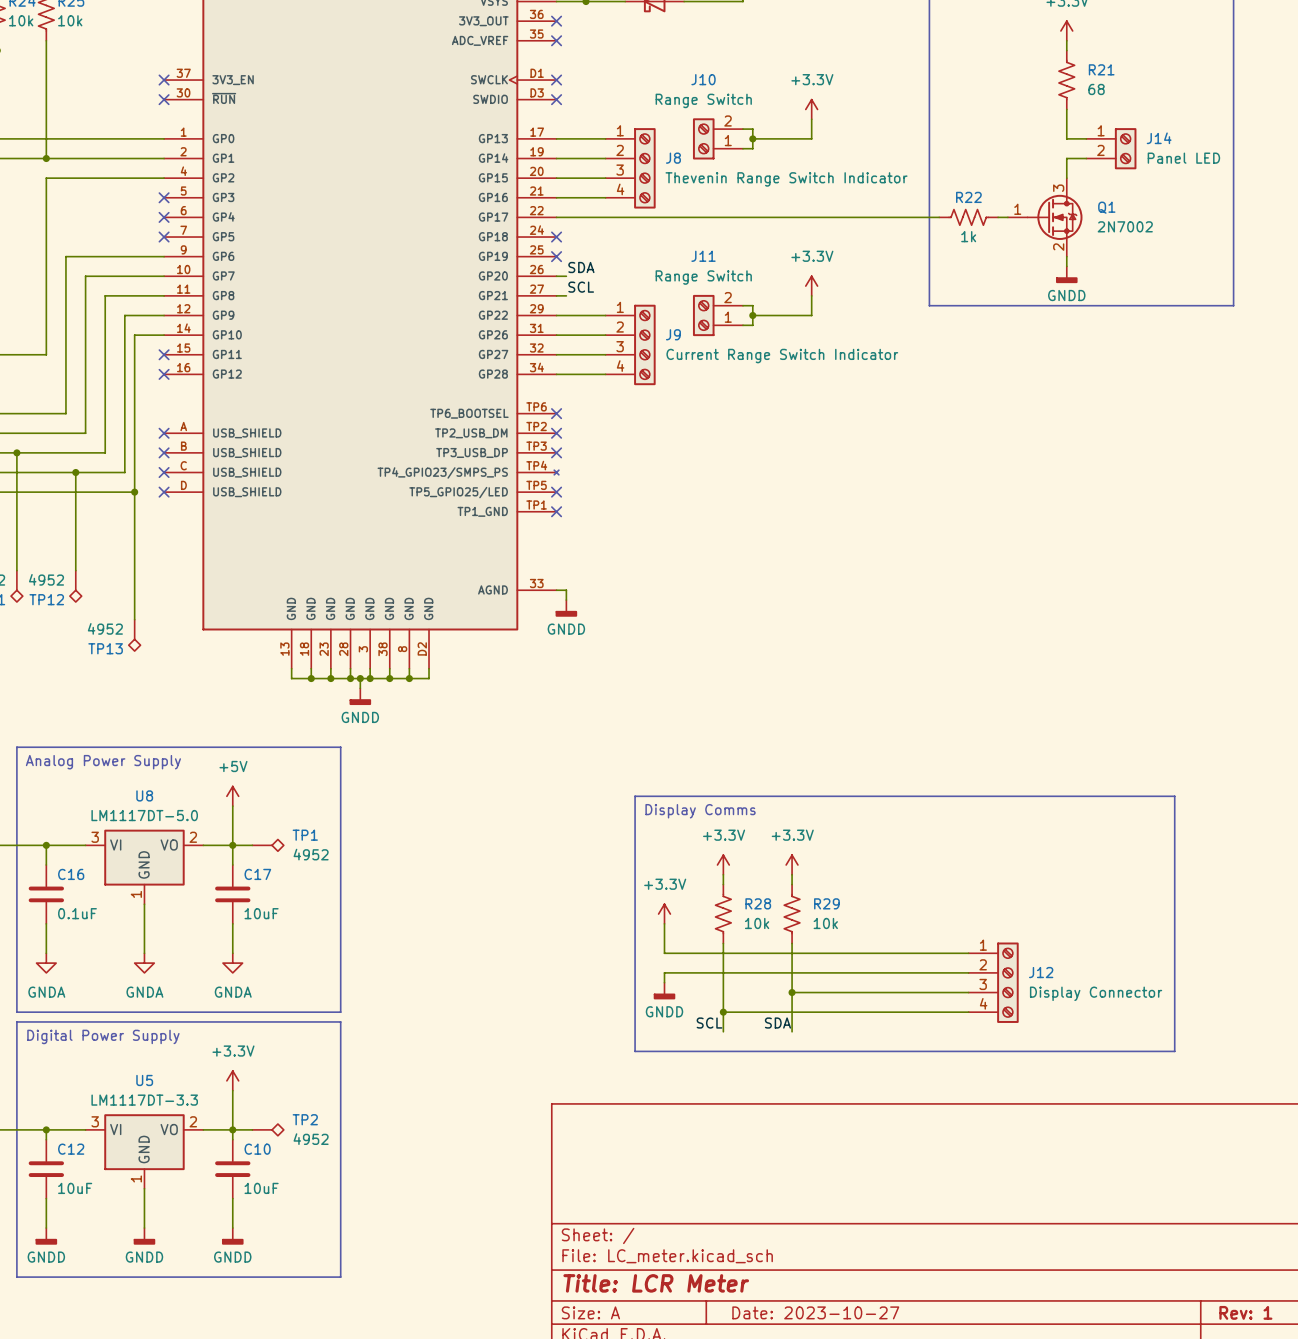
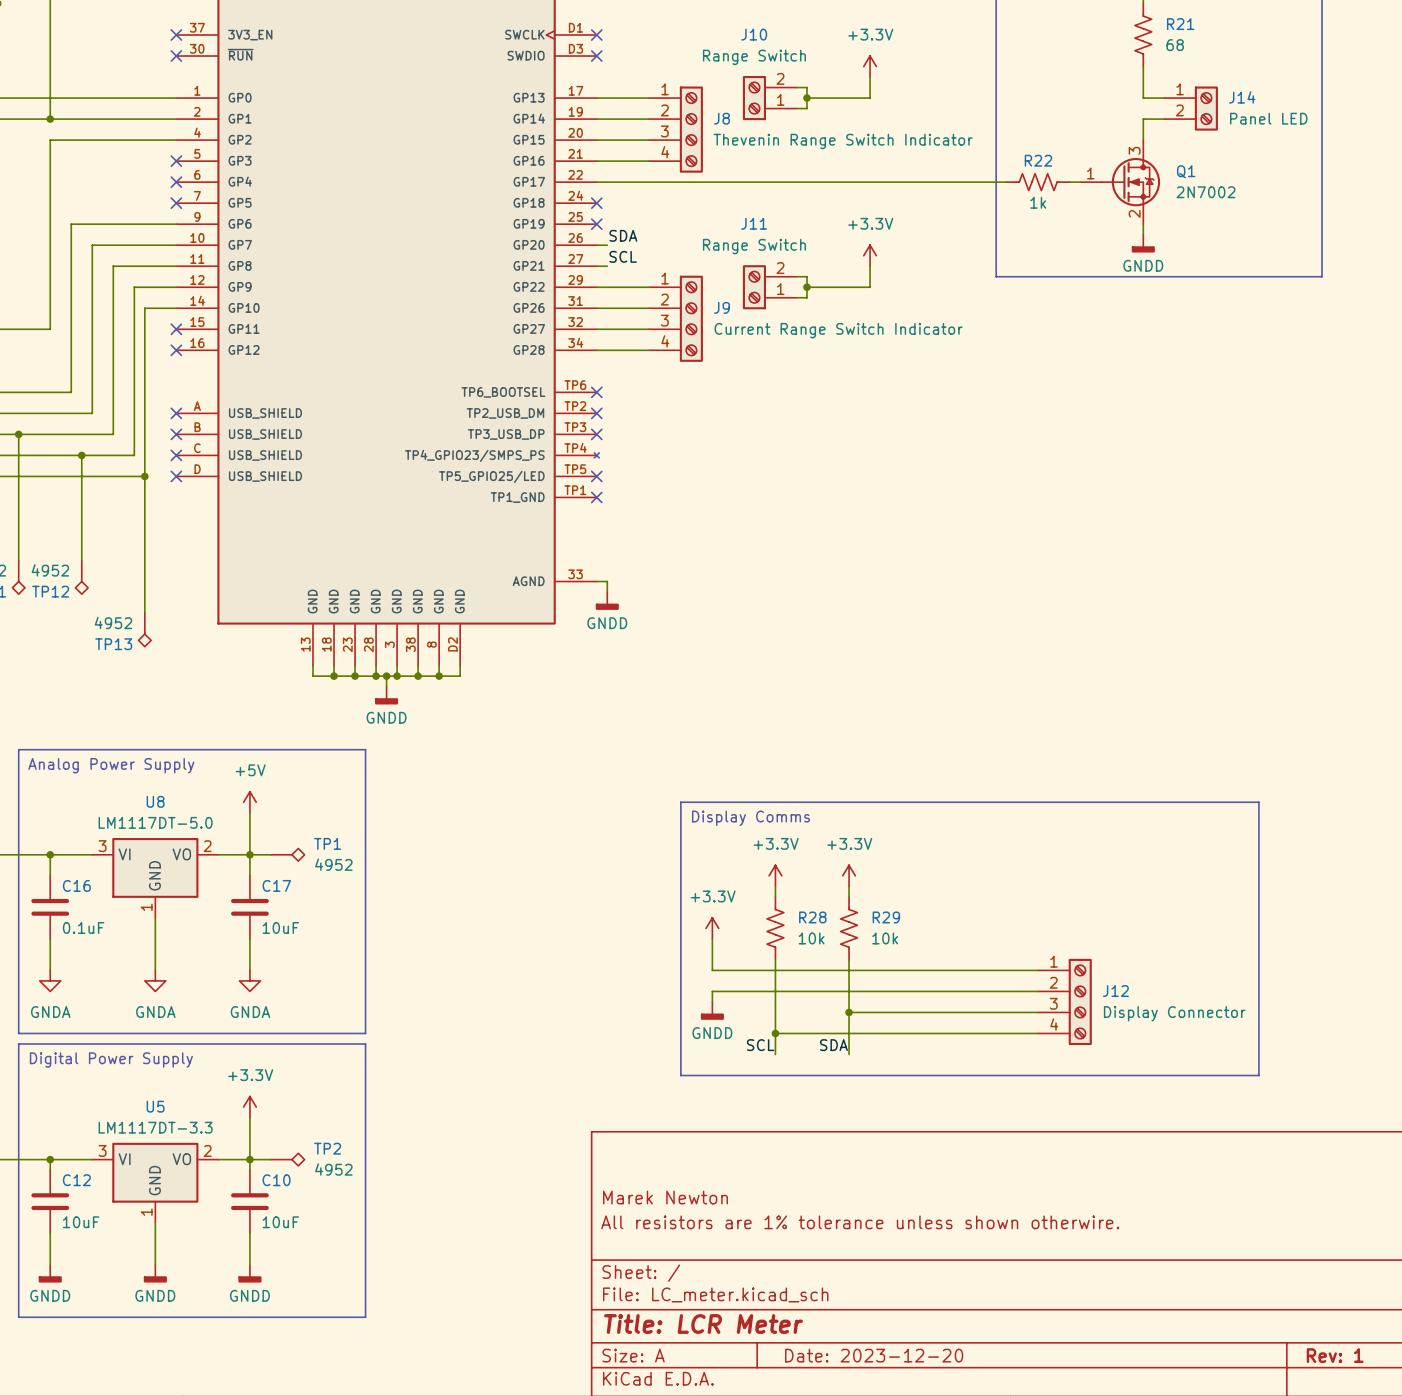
title block: none -> Marek Newton (665, 1197)
title block: none -> All resistors are 1% tolerance unless shown otherwire. (860, 1222)
title block: Date: 2023-10-27 (815, 1312) -> Date: 2023-12-20 (874, 1355)

